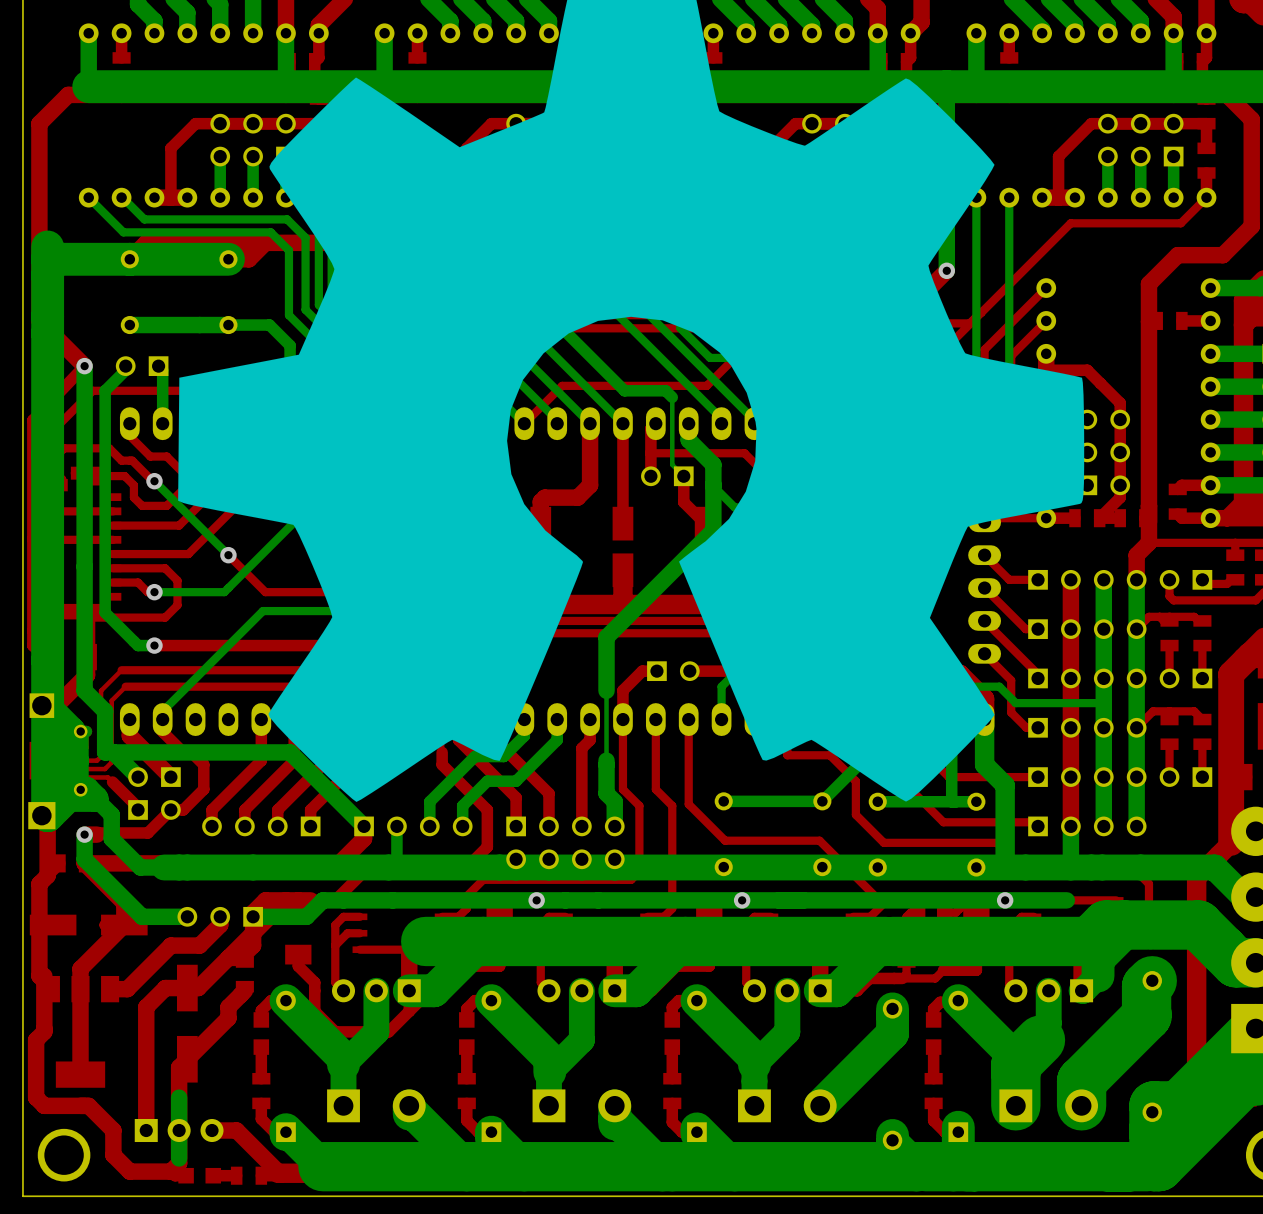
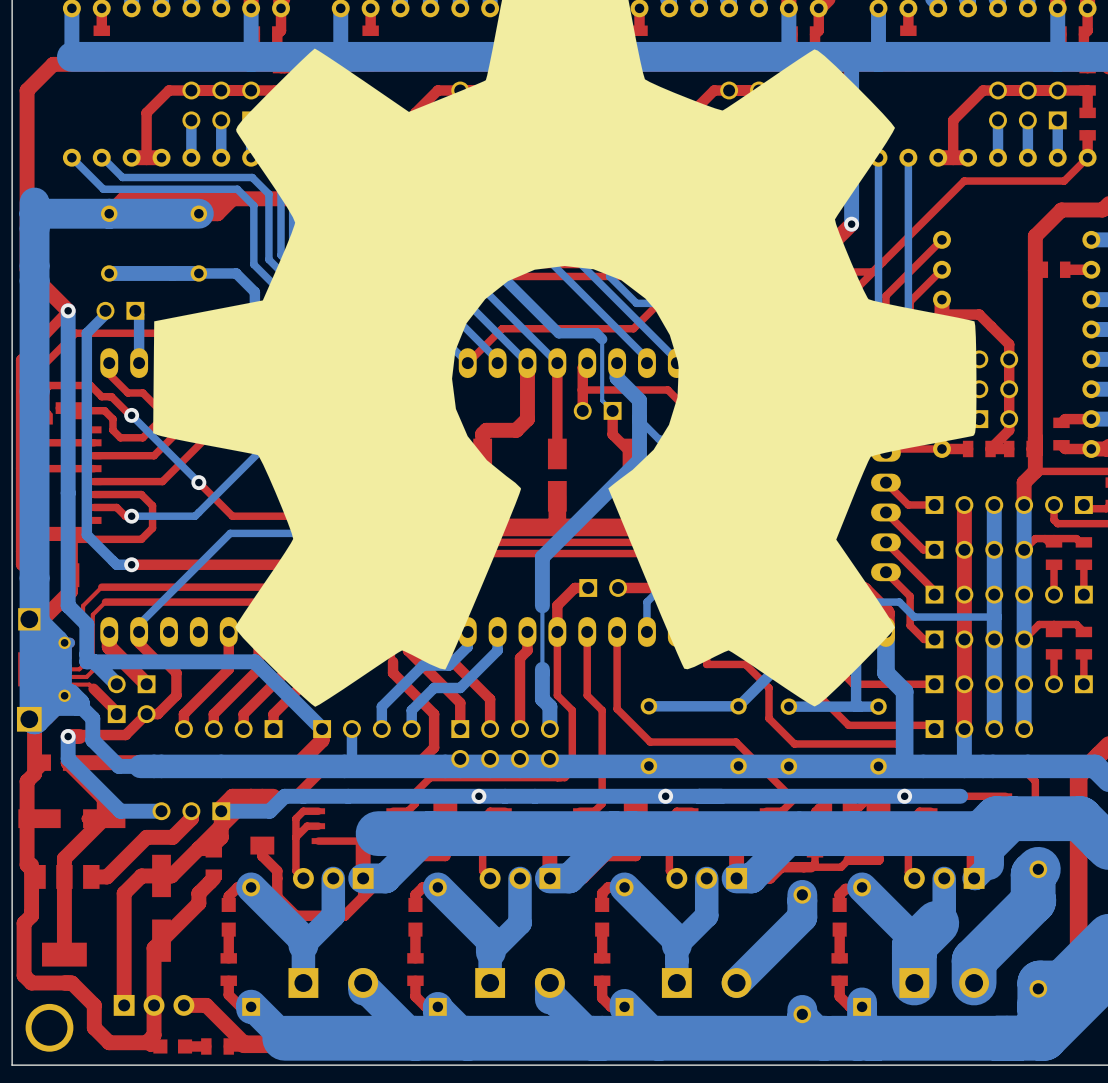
bottom track: (179, 1097) (179, 1158) -> none

